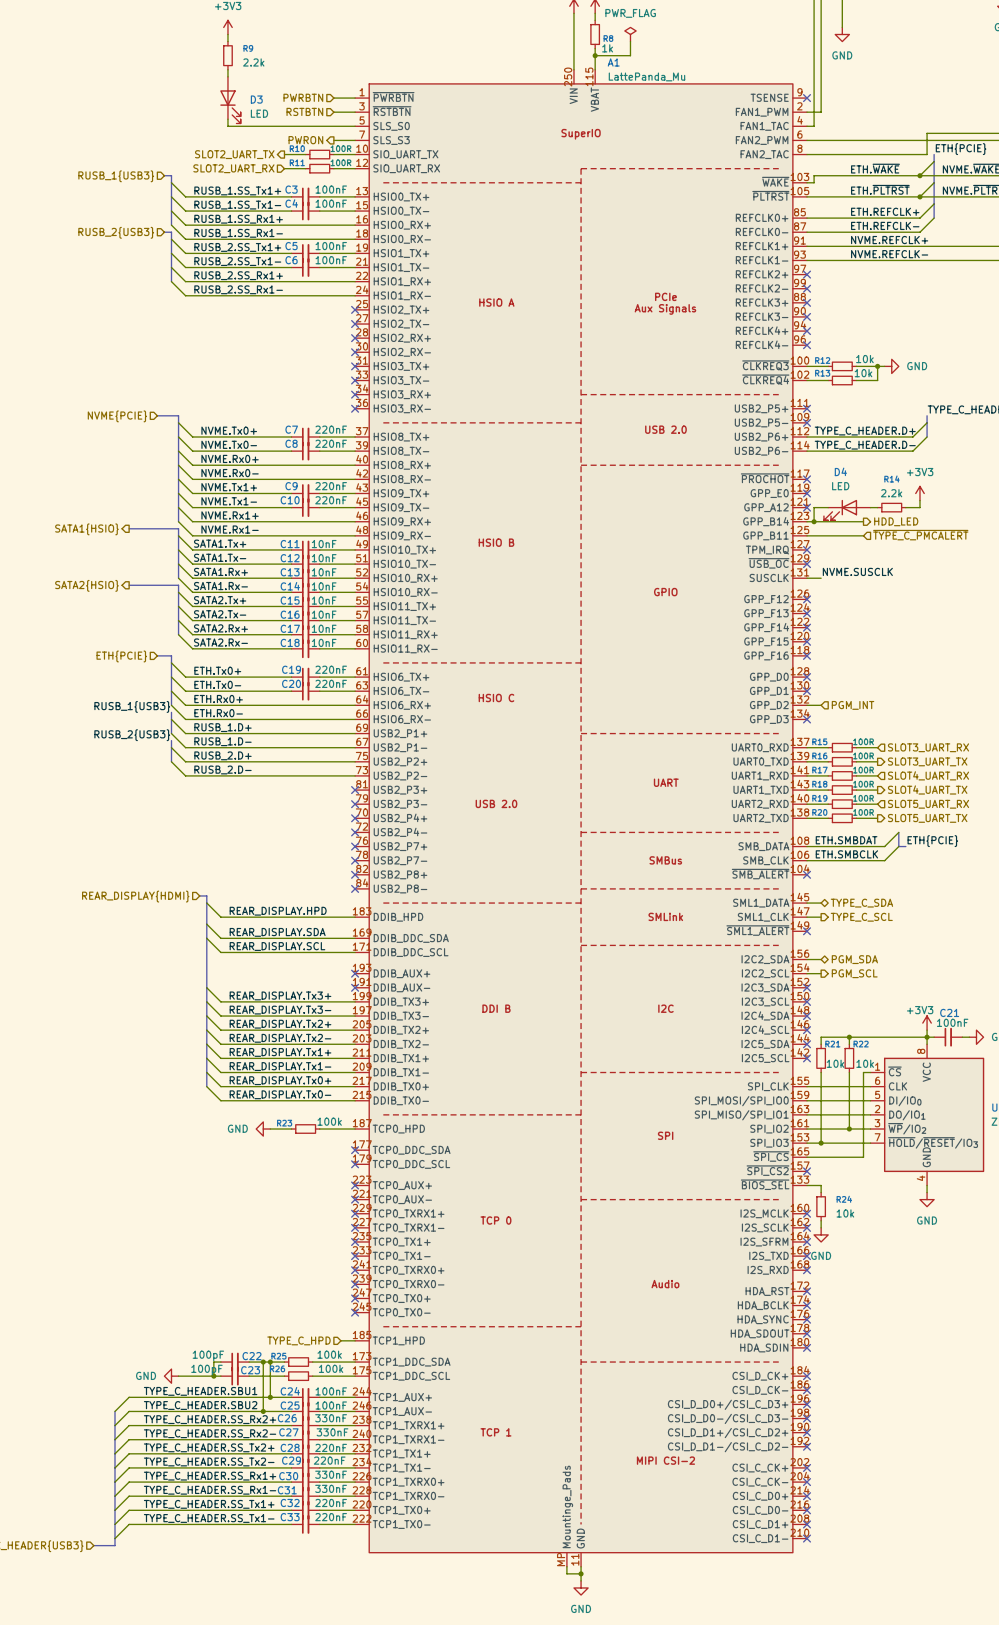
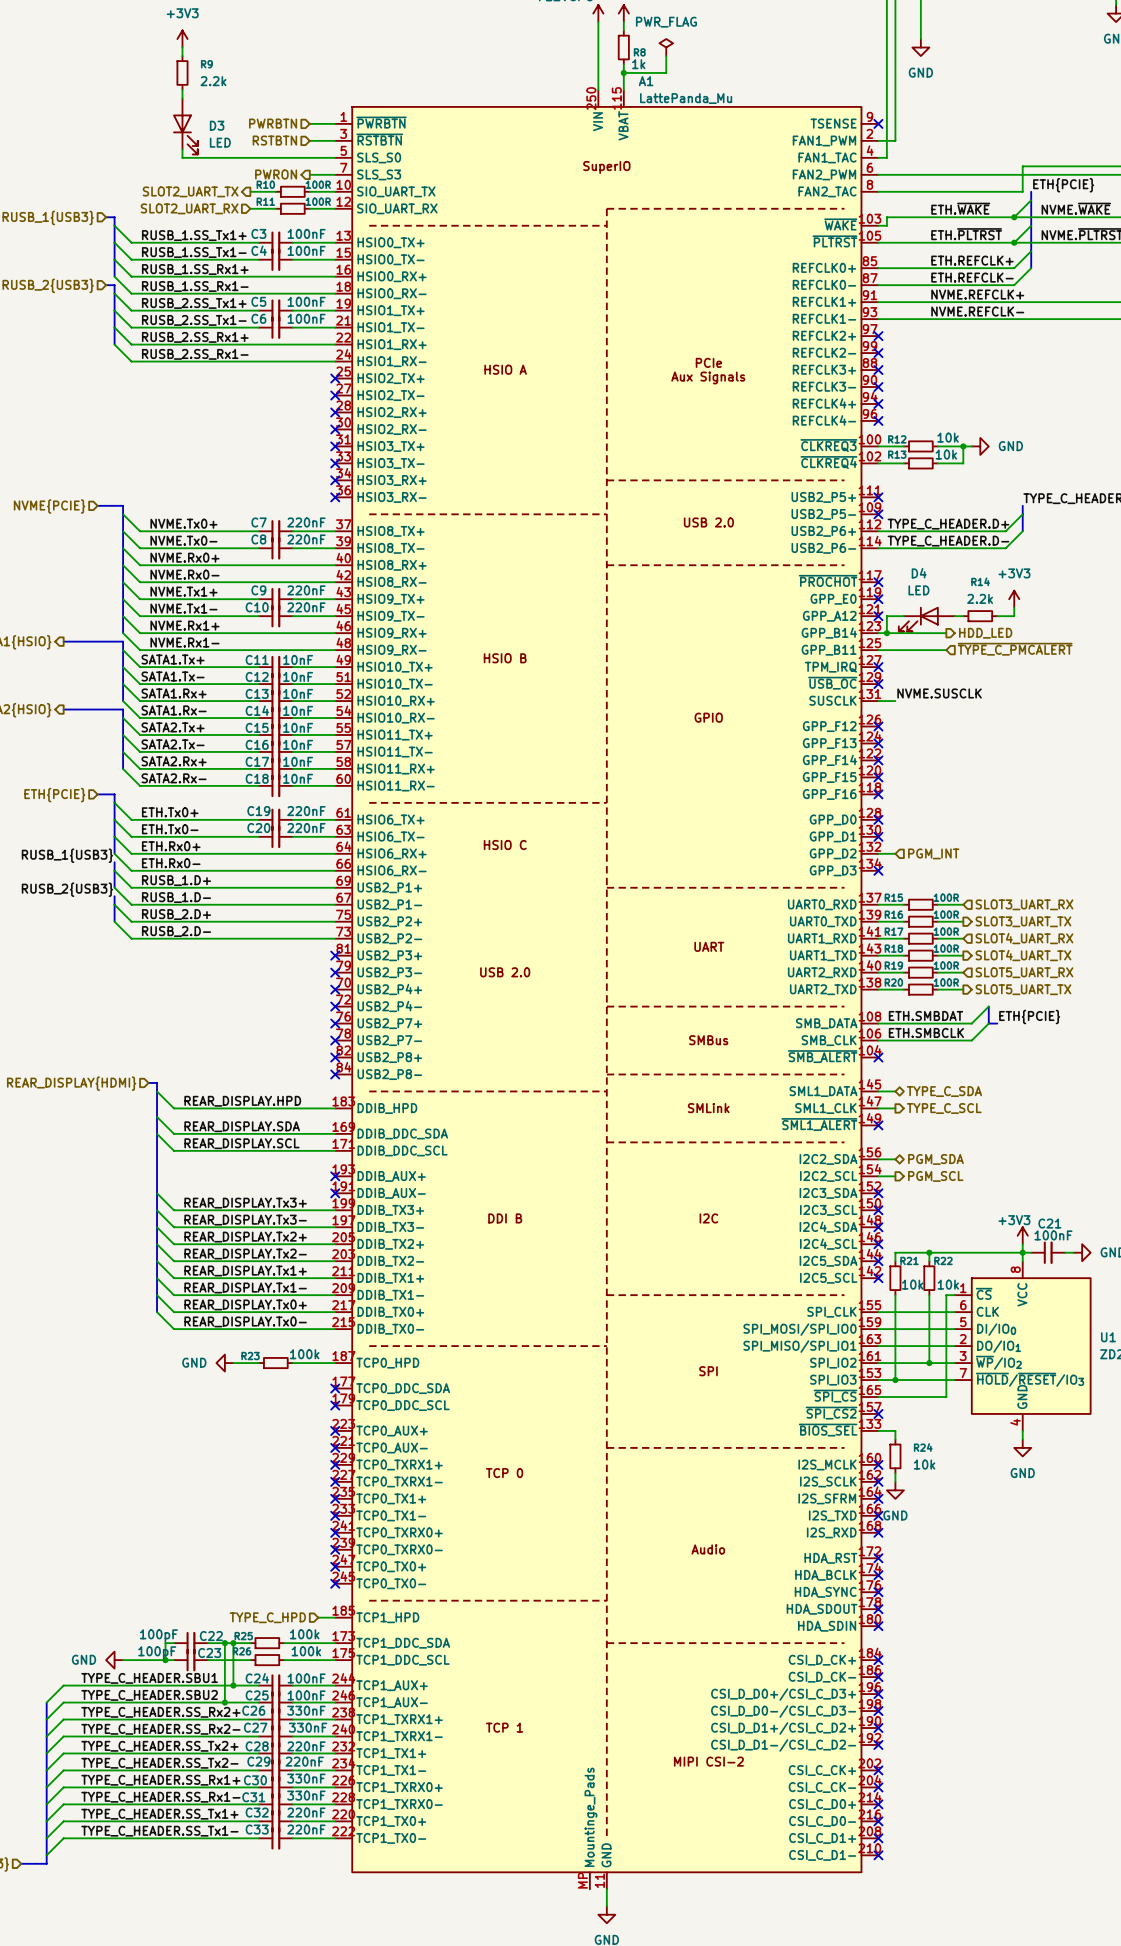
wire: (566, 1566) (566, 1573) (581, 1573) -> none
junction: (581, 1573) -> none

